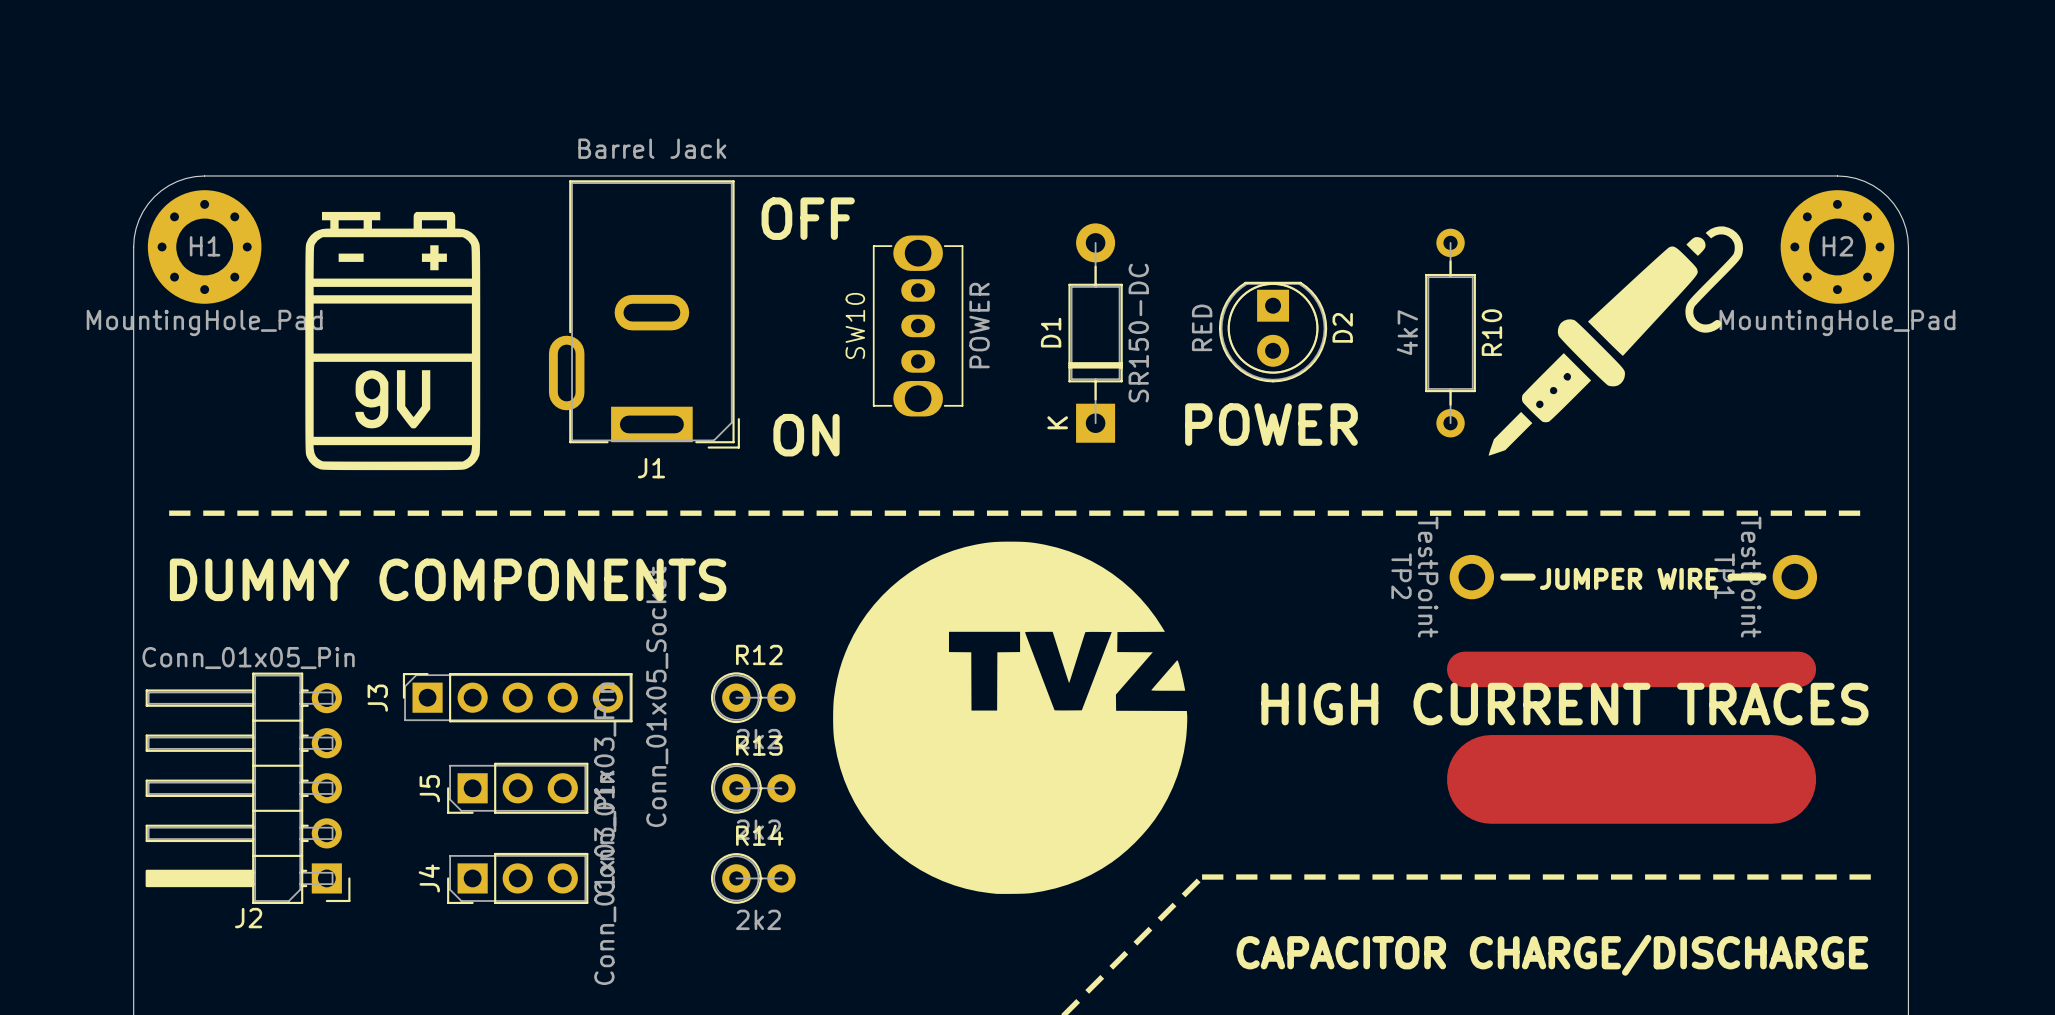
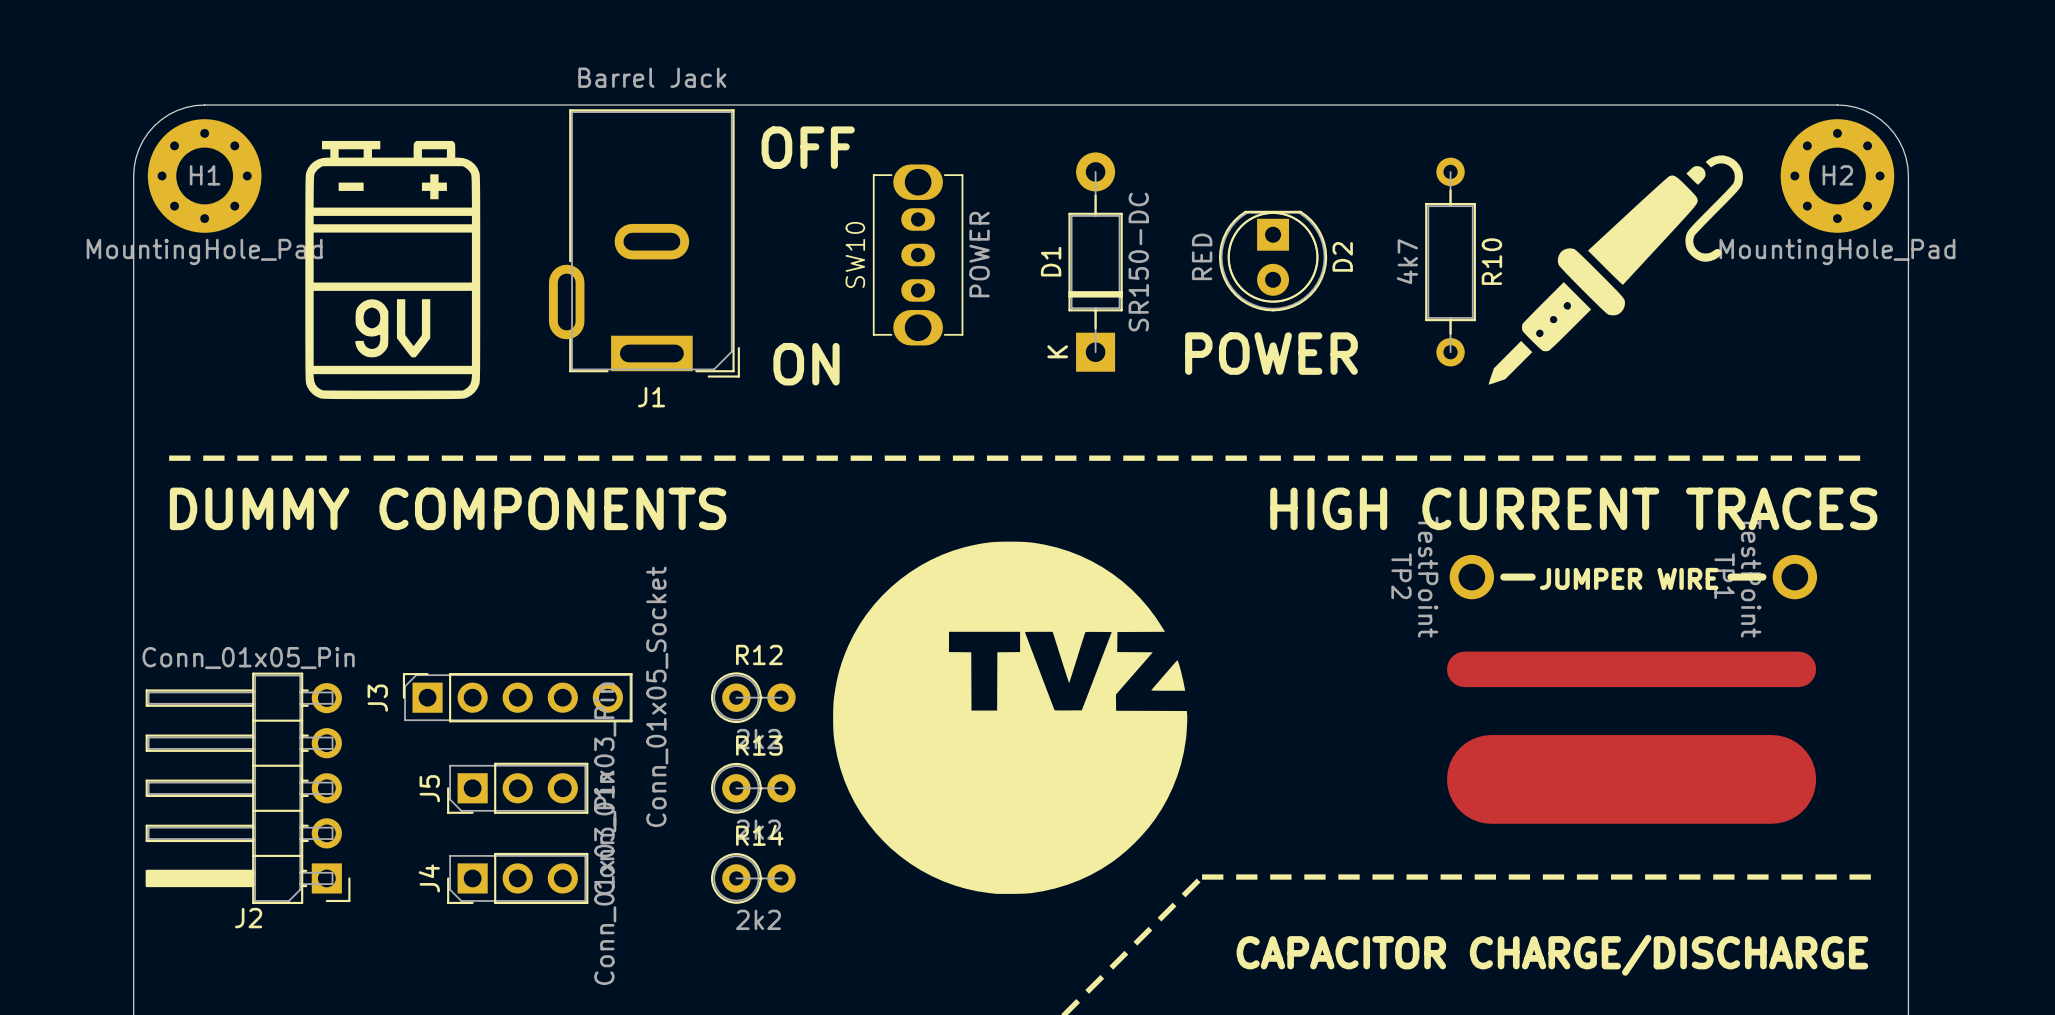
text position: OFF (808, 218) -> OFF (808, 147)
board edge: (133, 246) (139, 219) (154, 196) (177, 181) (204, 175) (1837, 175) (1864, 181) (1887, 196) (1903, 219) (1908, 246) -> (133, 246) (134, 166) (143, 140) (154, 125) (169, 114) (186, 107) (204, 105) (1846, 105) (1864, 110) (1880, 119) (1893, 132) (1903, 148) (1908, 175) (1908, 246)
H1 position: (204, 246) -> (204, 175)
H2 position: (1837, 246) -> (1837, 175)
J1 position: (644, 314) -> (644, 243)
SW10 position: (918, 325) -> (918, 254)
D2 position: (1273, 332) -> (1273, 261)
D1 position: (1095, 333) -> (1095, 262)
R10 position: (1450, 333) -> (1450, 262)
drawing position: (392, 341) -> (392, 270)
drawing position: (1615, 341) -> (1615, 270)
text position: POWER (1271, 424) -> POWER (1271, 353)
text position: ON (806, 435) -> ON (806, 364)
line: (169, 513) (1872, 513) -> (169, 458) (1872, 458)
text position: DUMMY COMPONENTS (448, 579) -> DUMMY COMPONENTS (448, 508)
text position: HIGH CURRENT TRACES (1564, 704) -> HIGH CURRENT TRACES (1573, 508)

